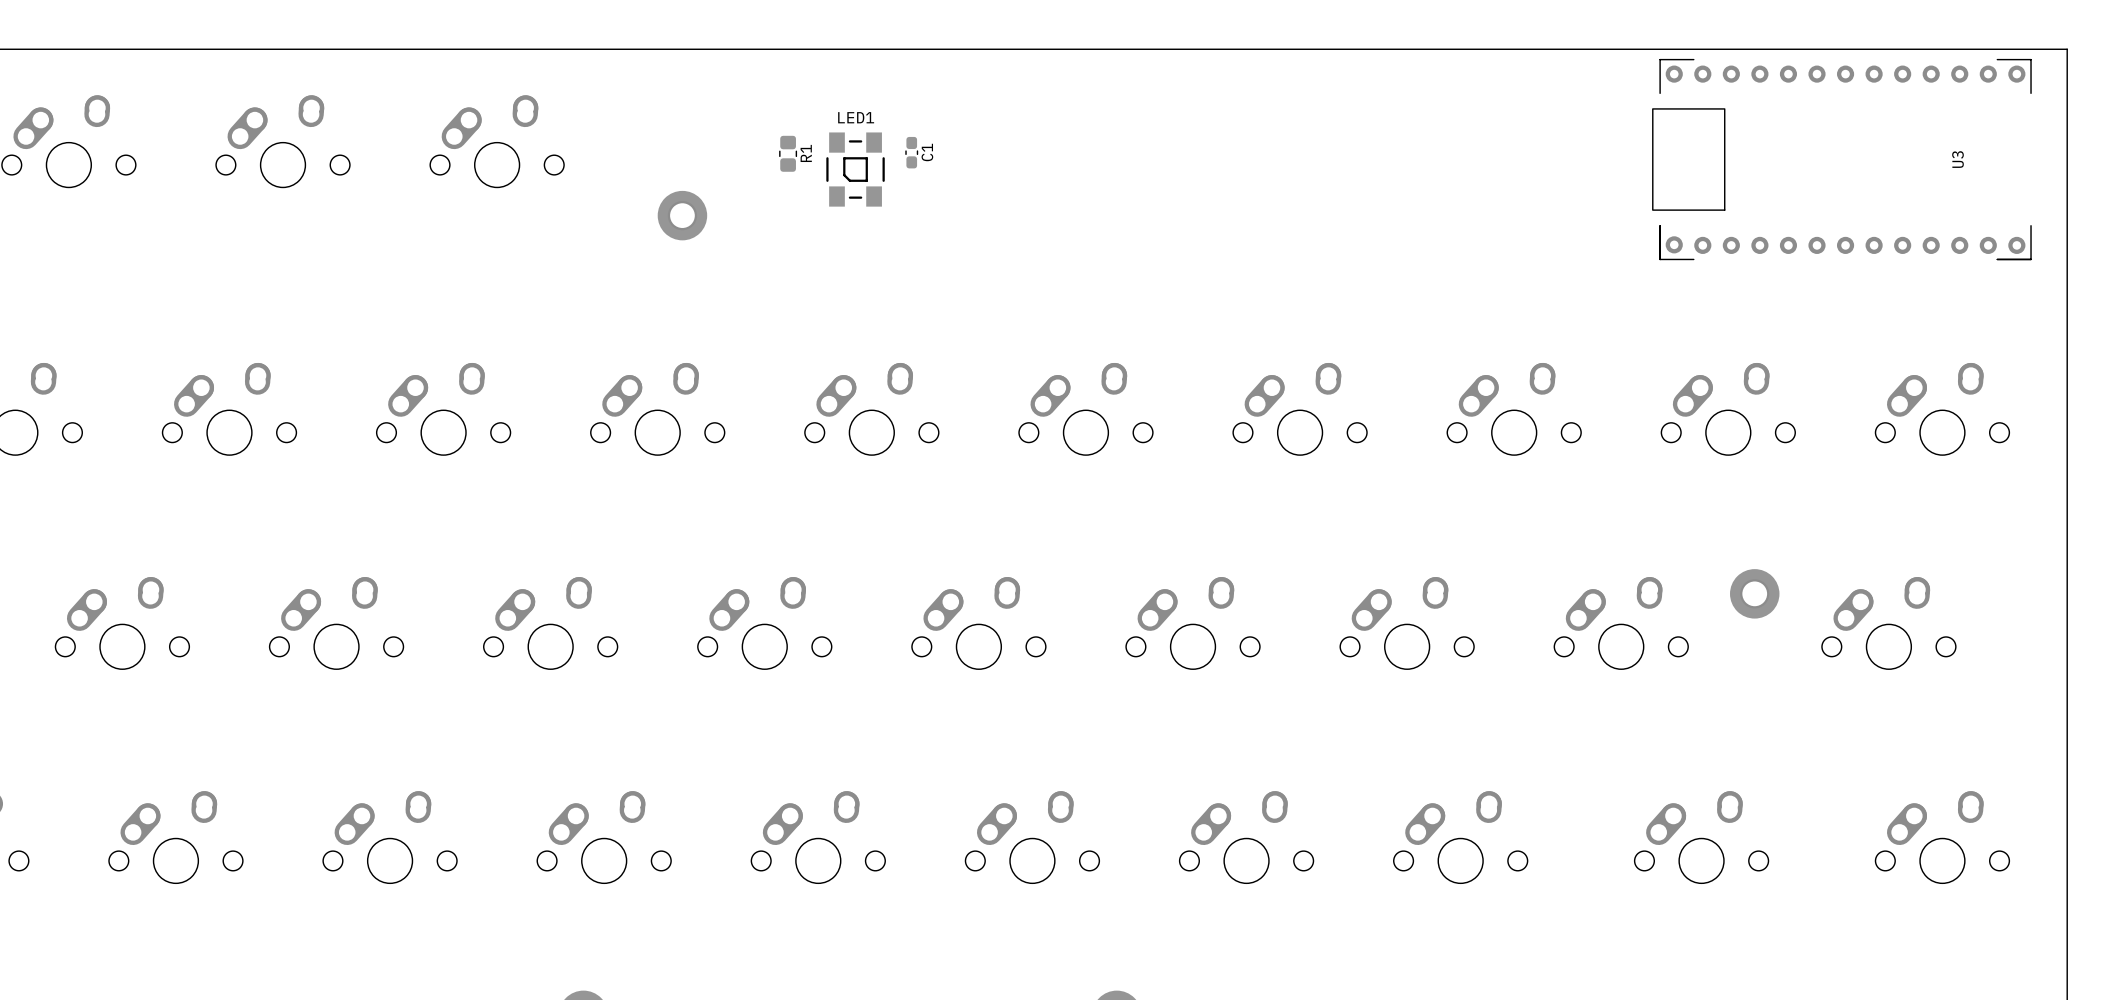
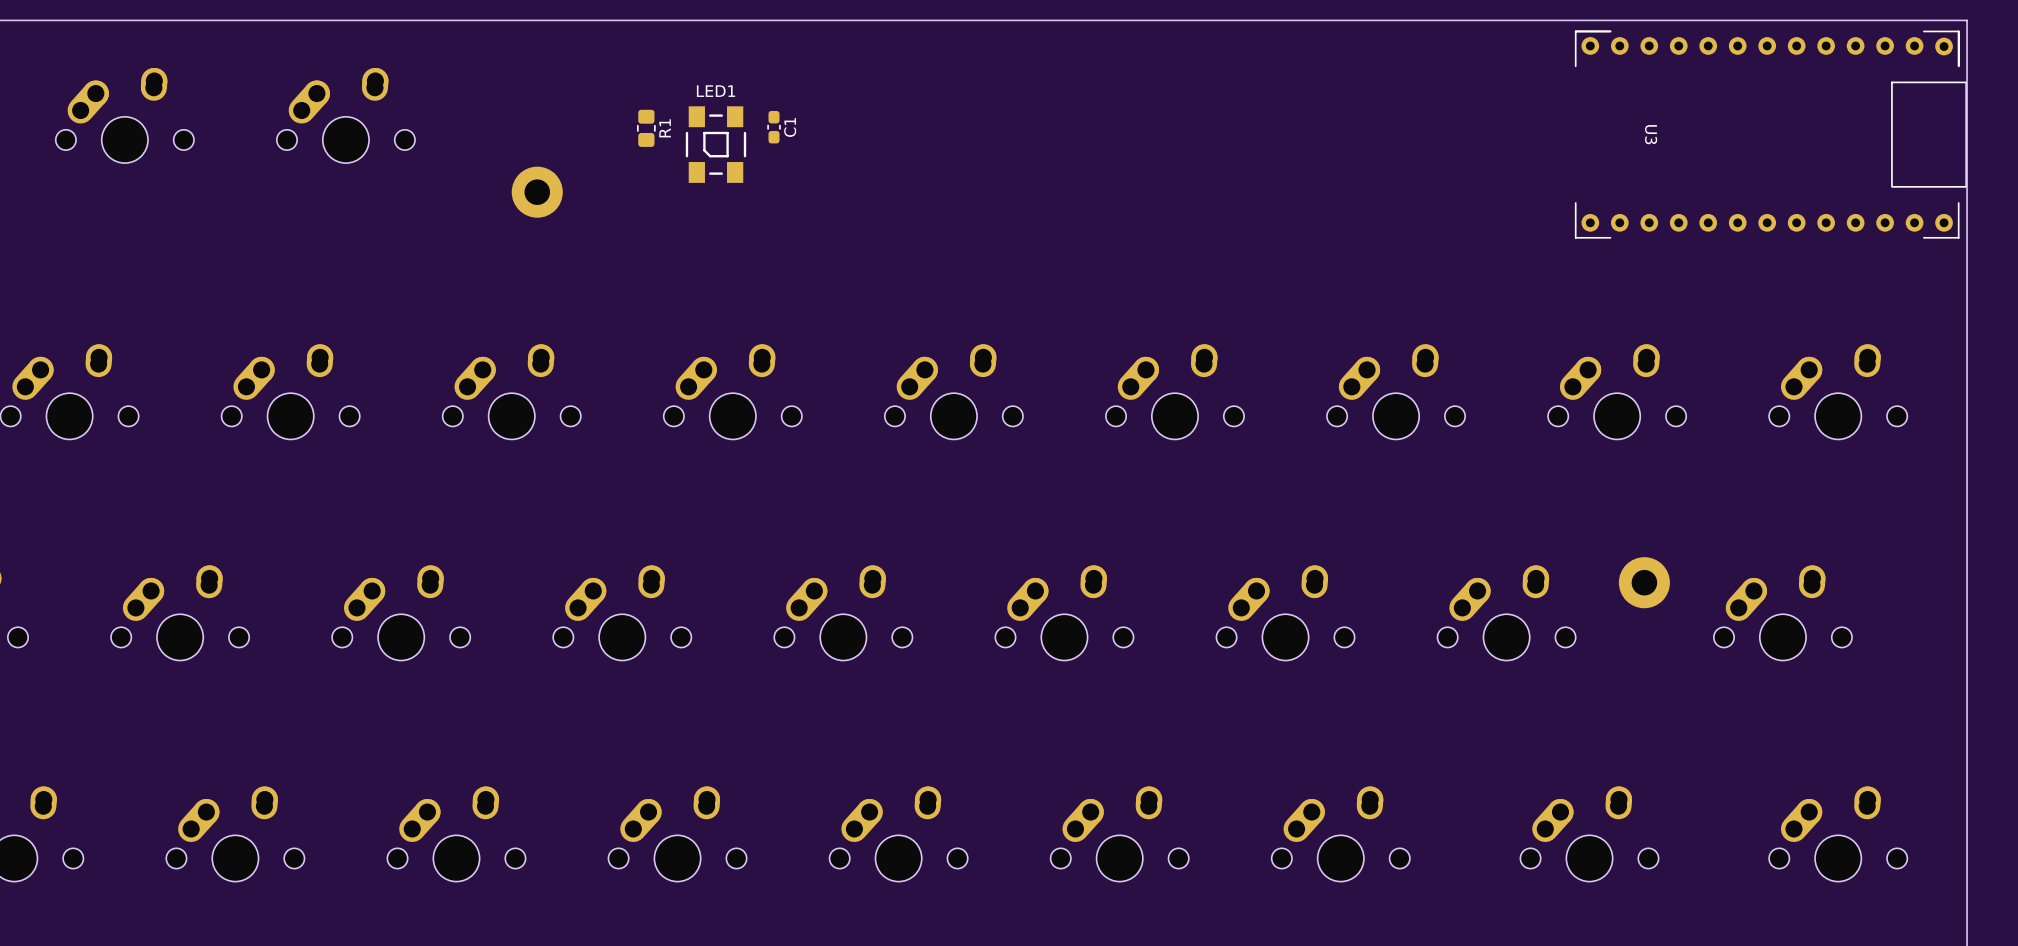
U3 rotation: 0° (1841, 159) -> 180° (1770, 134)

